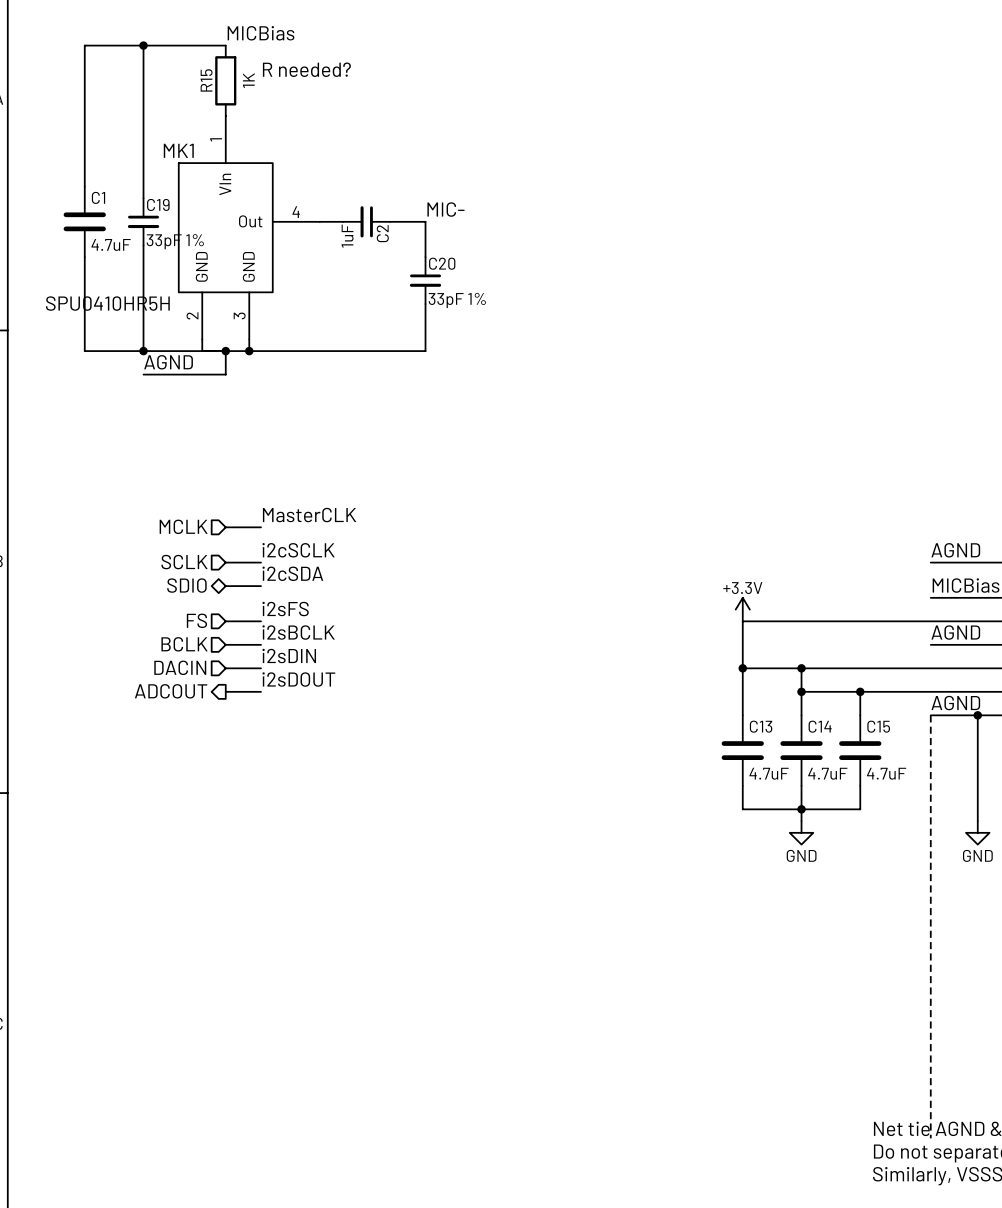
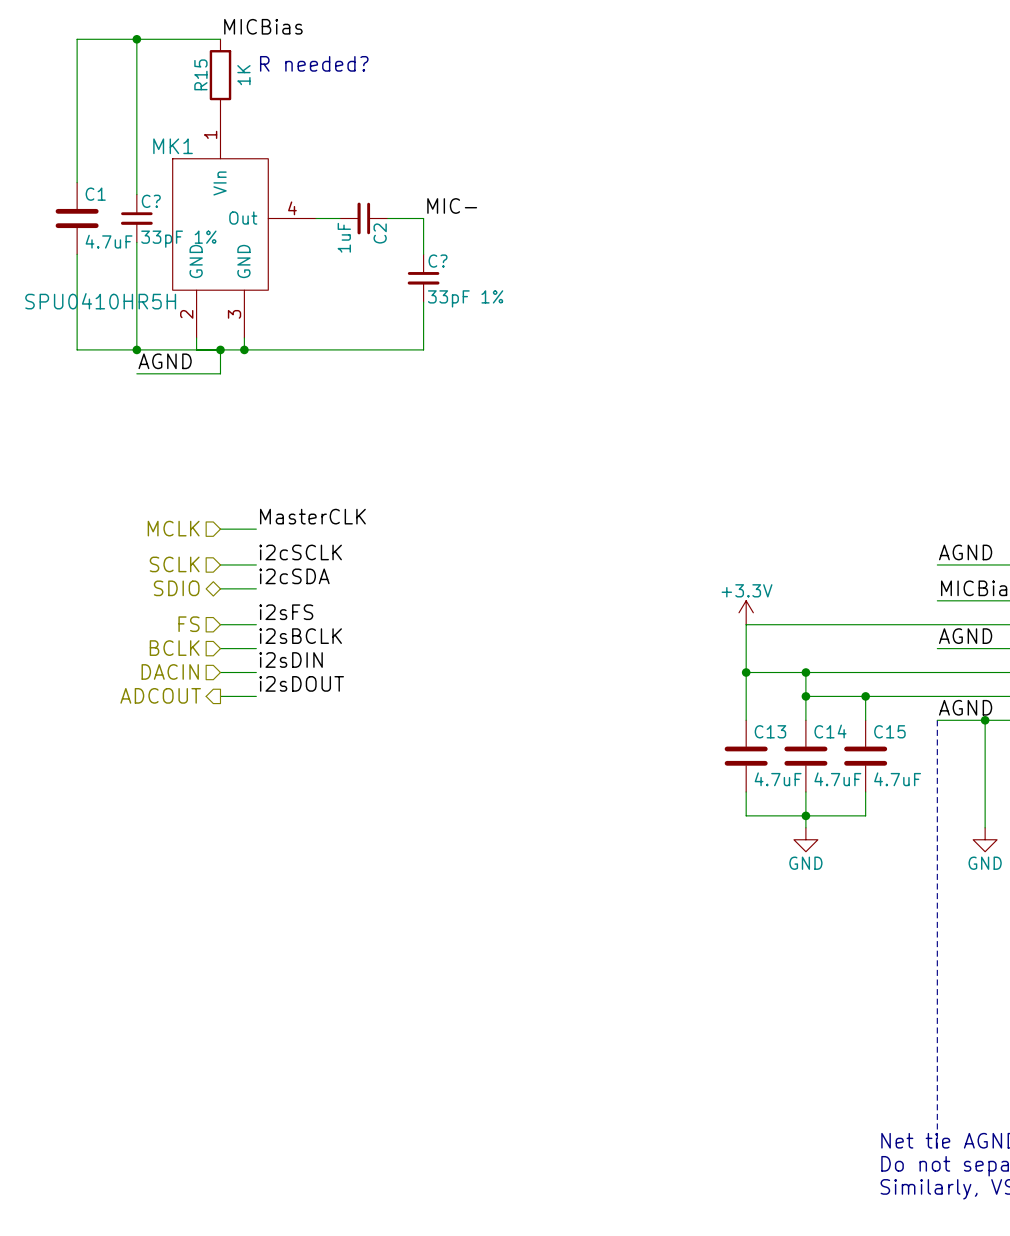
C19 name: C19 (158, 204) -> C? (151, 201)
C20 name: C20 (442, 263) -> C? (438, 261)

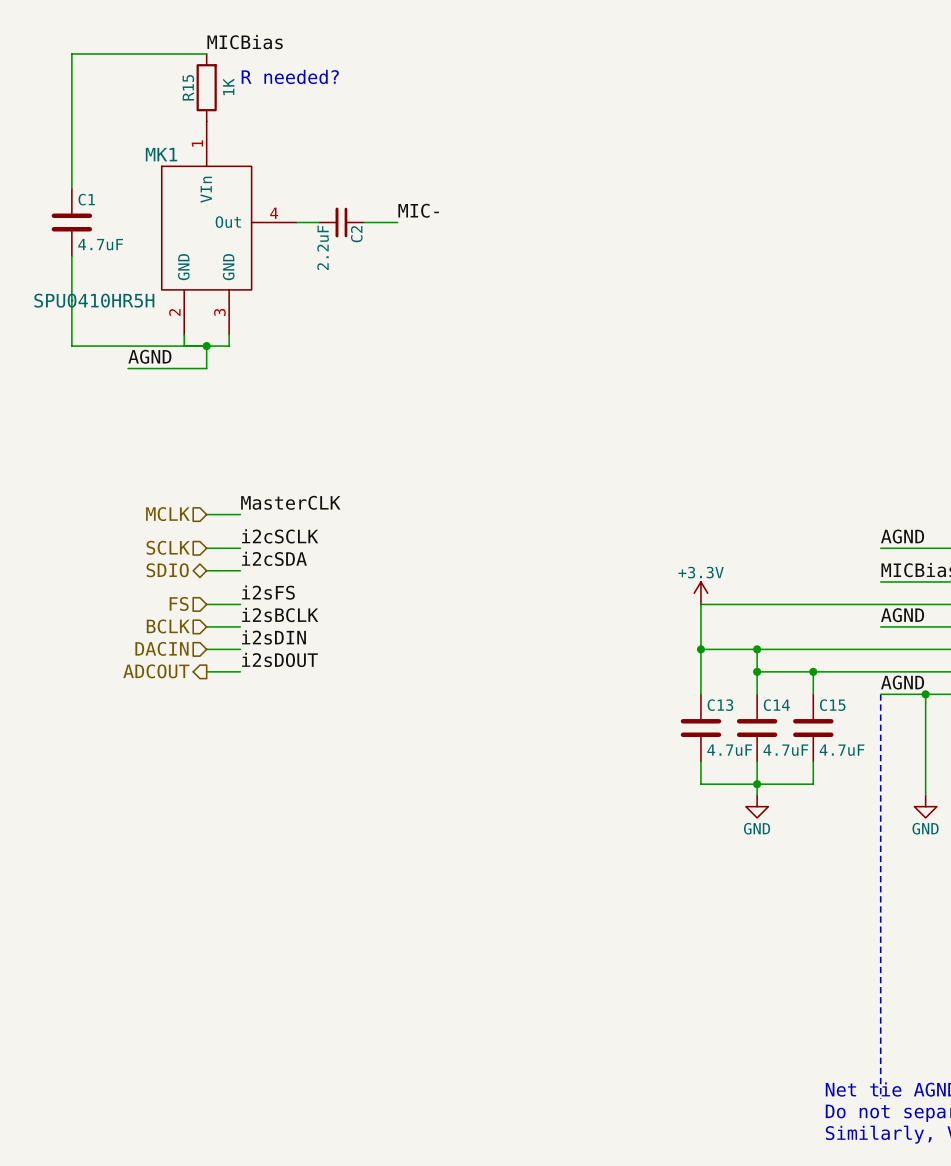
wire: (136, 39) (136, 194) -> none
junction: (136, 39) -> none
C?: 33pF 1% (136, 218) -> none
wire: (423, 218) (423, 254) -> none
C2 value: 1uF (344, 237) -> 2.2uF (323, 247)
wire: (136, 242) (136, 349) -> none
C?: 33pF 1% (423, 278) -> none
wire: (423, 302) (423, 349) (244, 349) -> none
junction: (136, 349) -> none
junction: (244, 349) -> none

